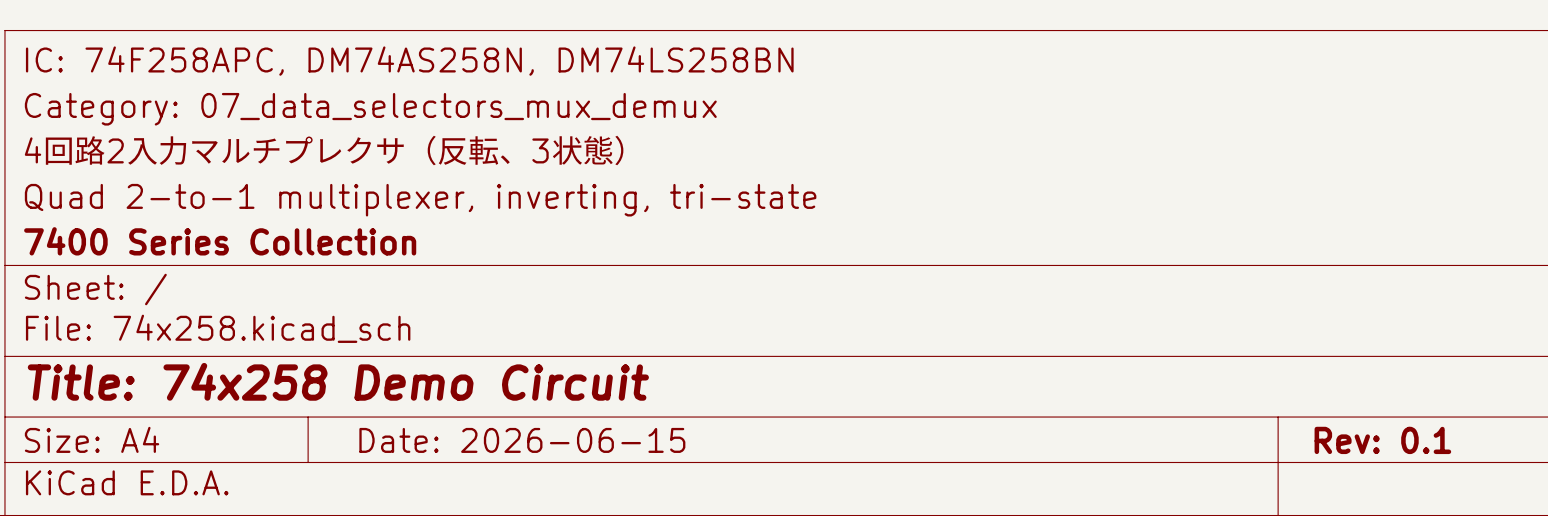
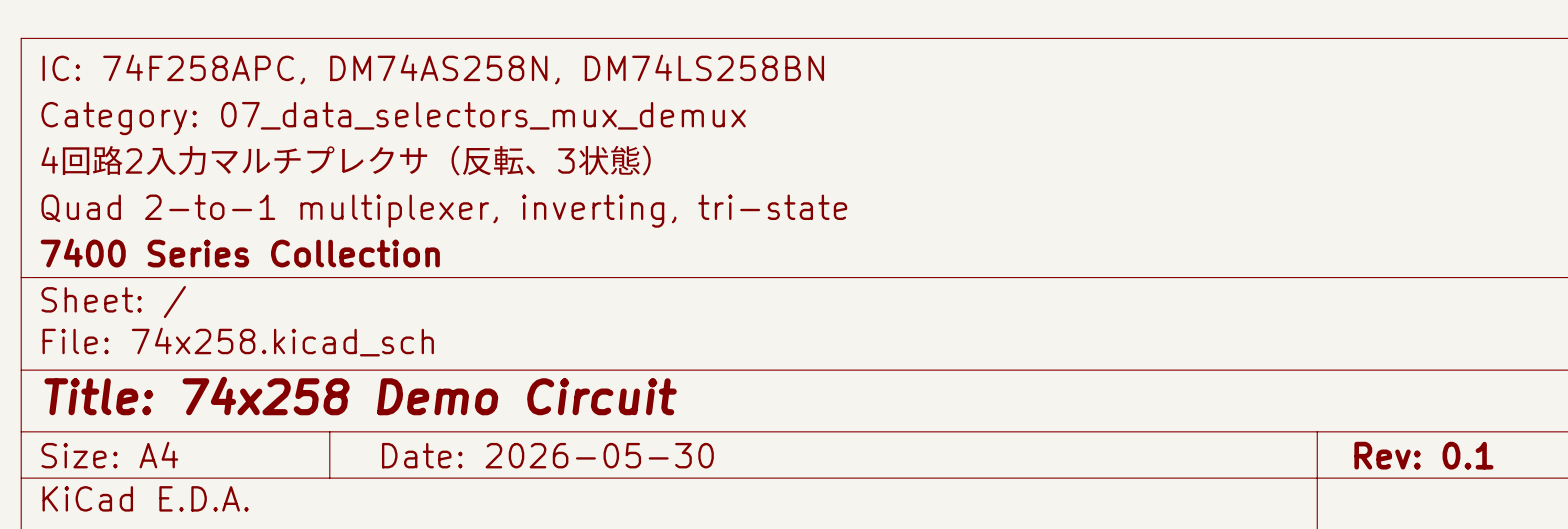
title block: Date: 2026-06-15 (522, 440) -> Date: 2026-05-30 (547, 455)

